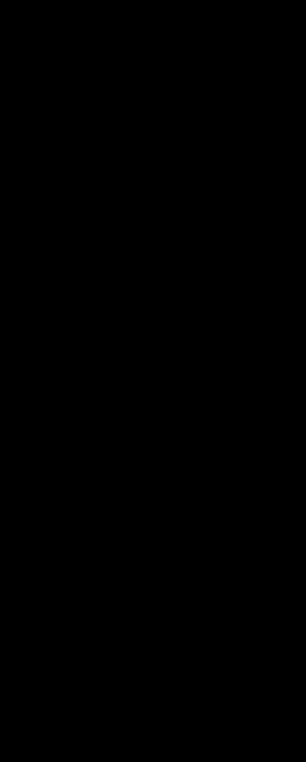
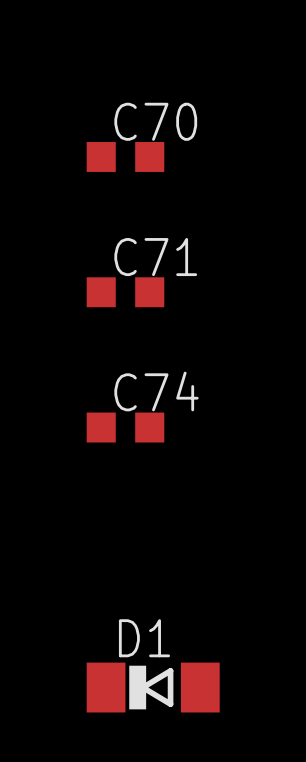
C70: none -> (125, 156)
C71: none -> (125, 292)
C74: none -> (125, 427)
D1: none -> (153, 687)

